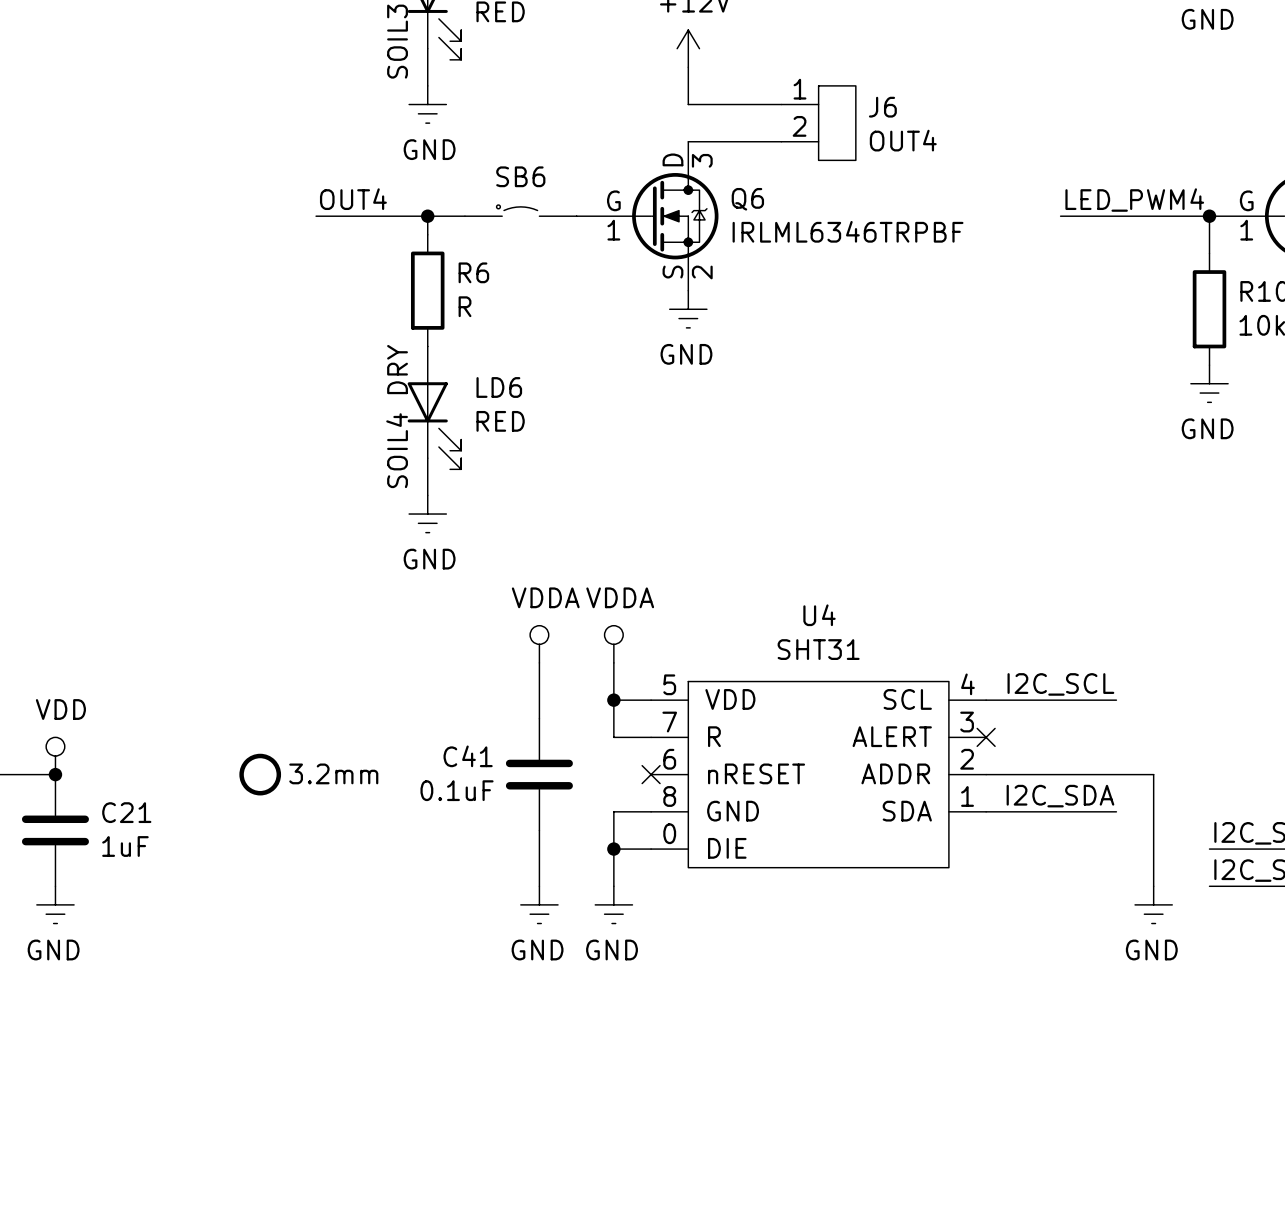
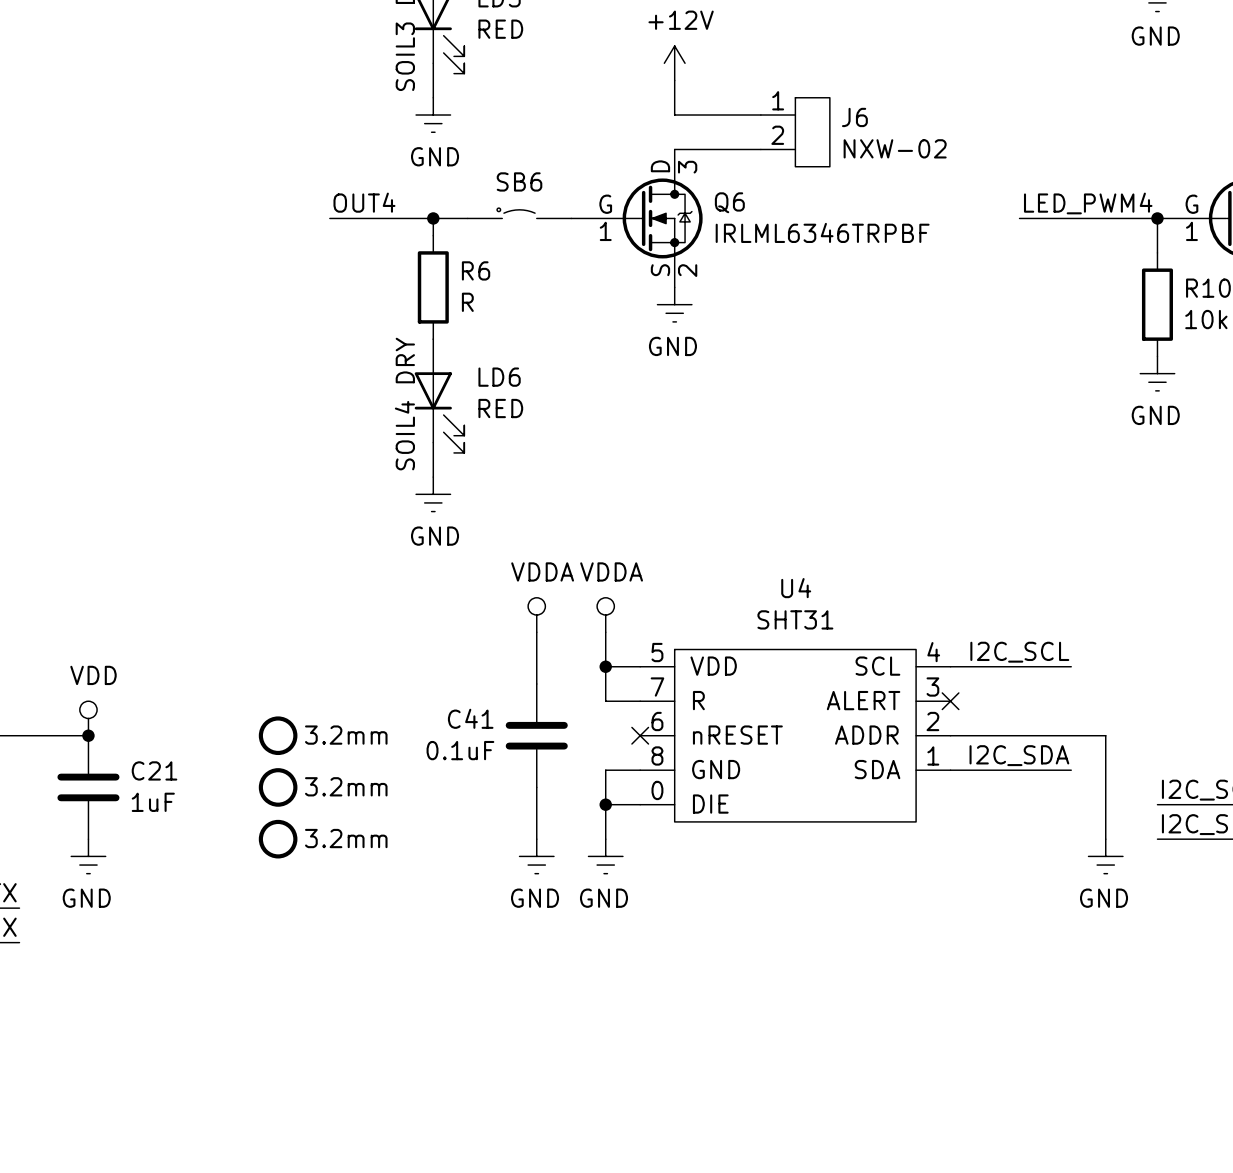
J6 value: OUT4 (903, 140) -> NXW-02 (895, 148)
part: none -> (278, 787)
part: none -> (278, 839)

